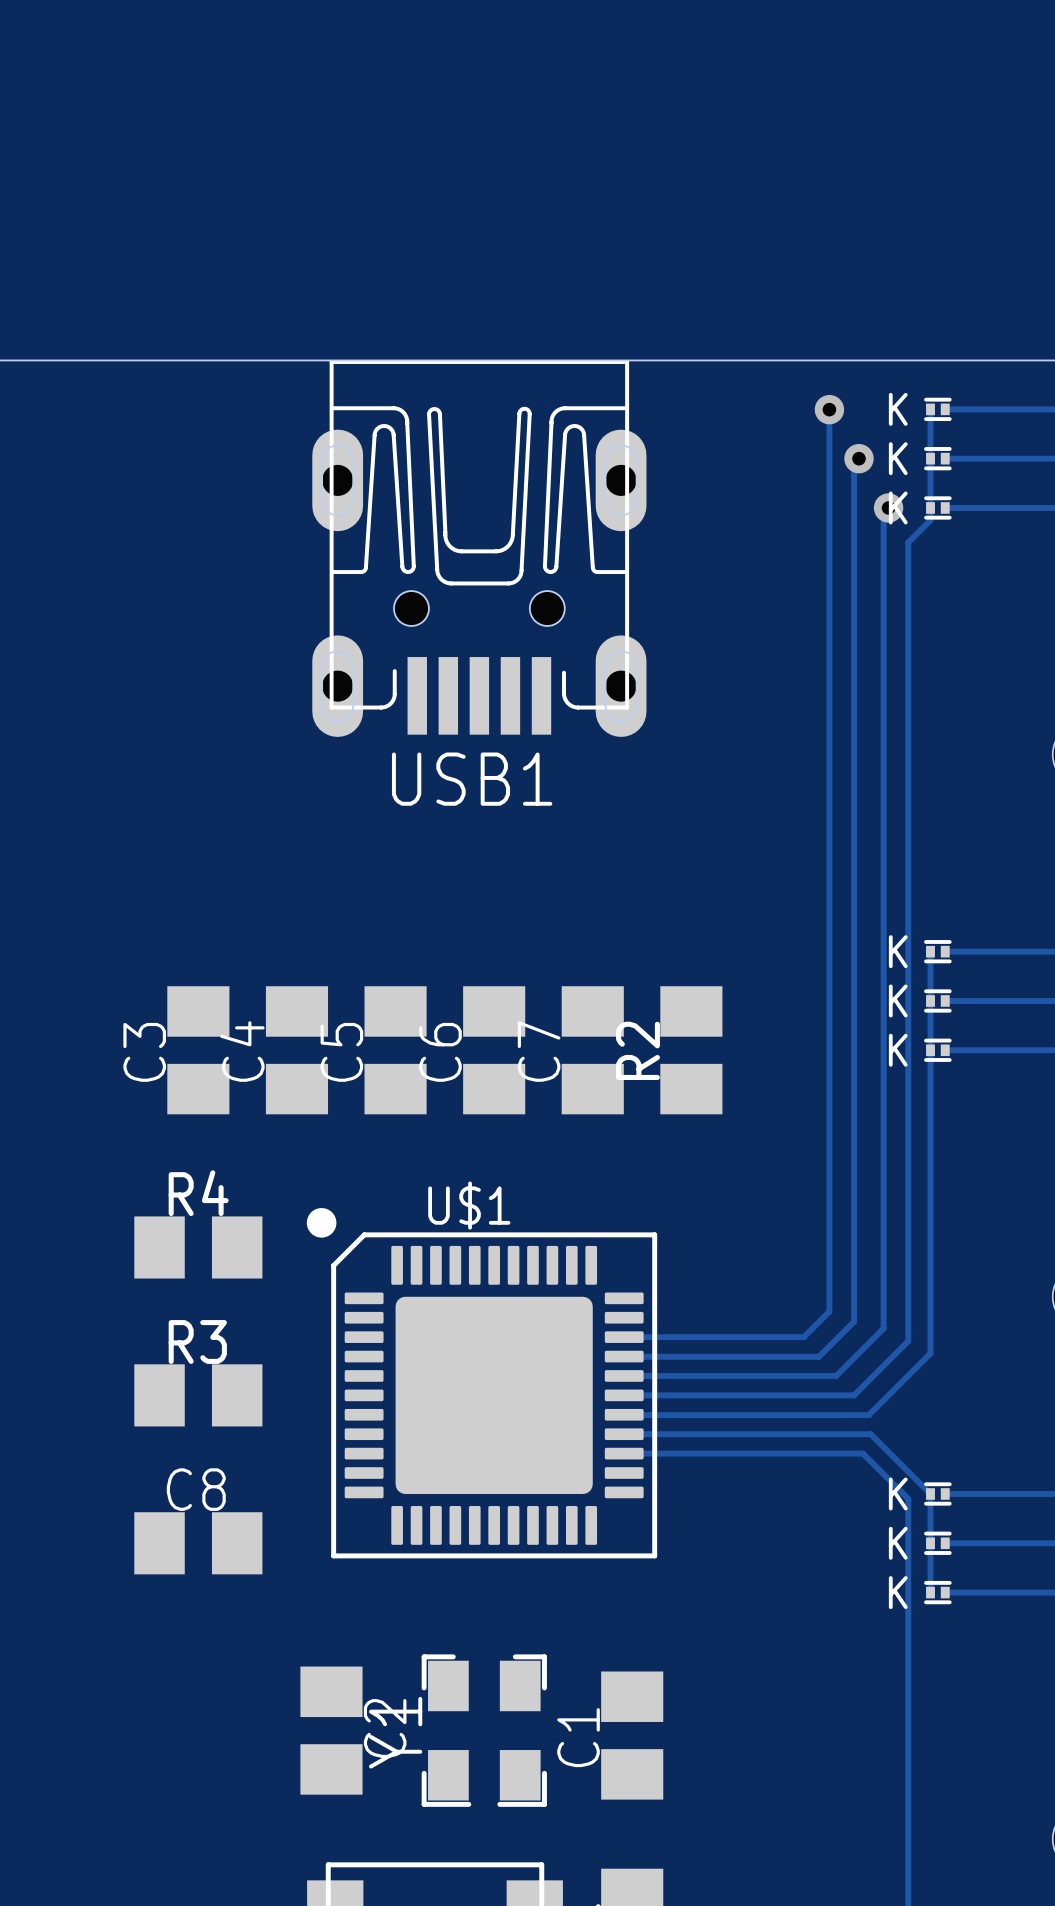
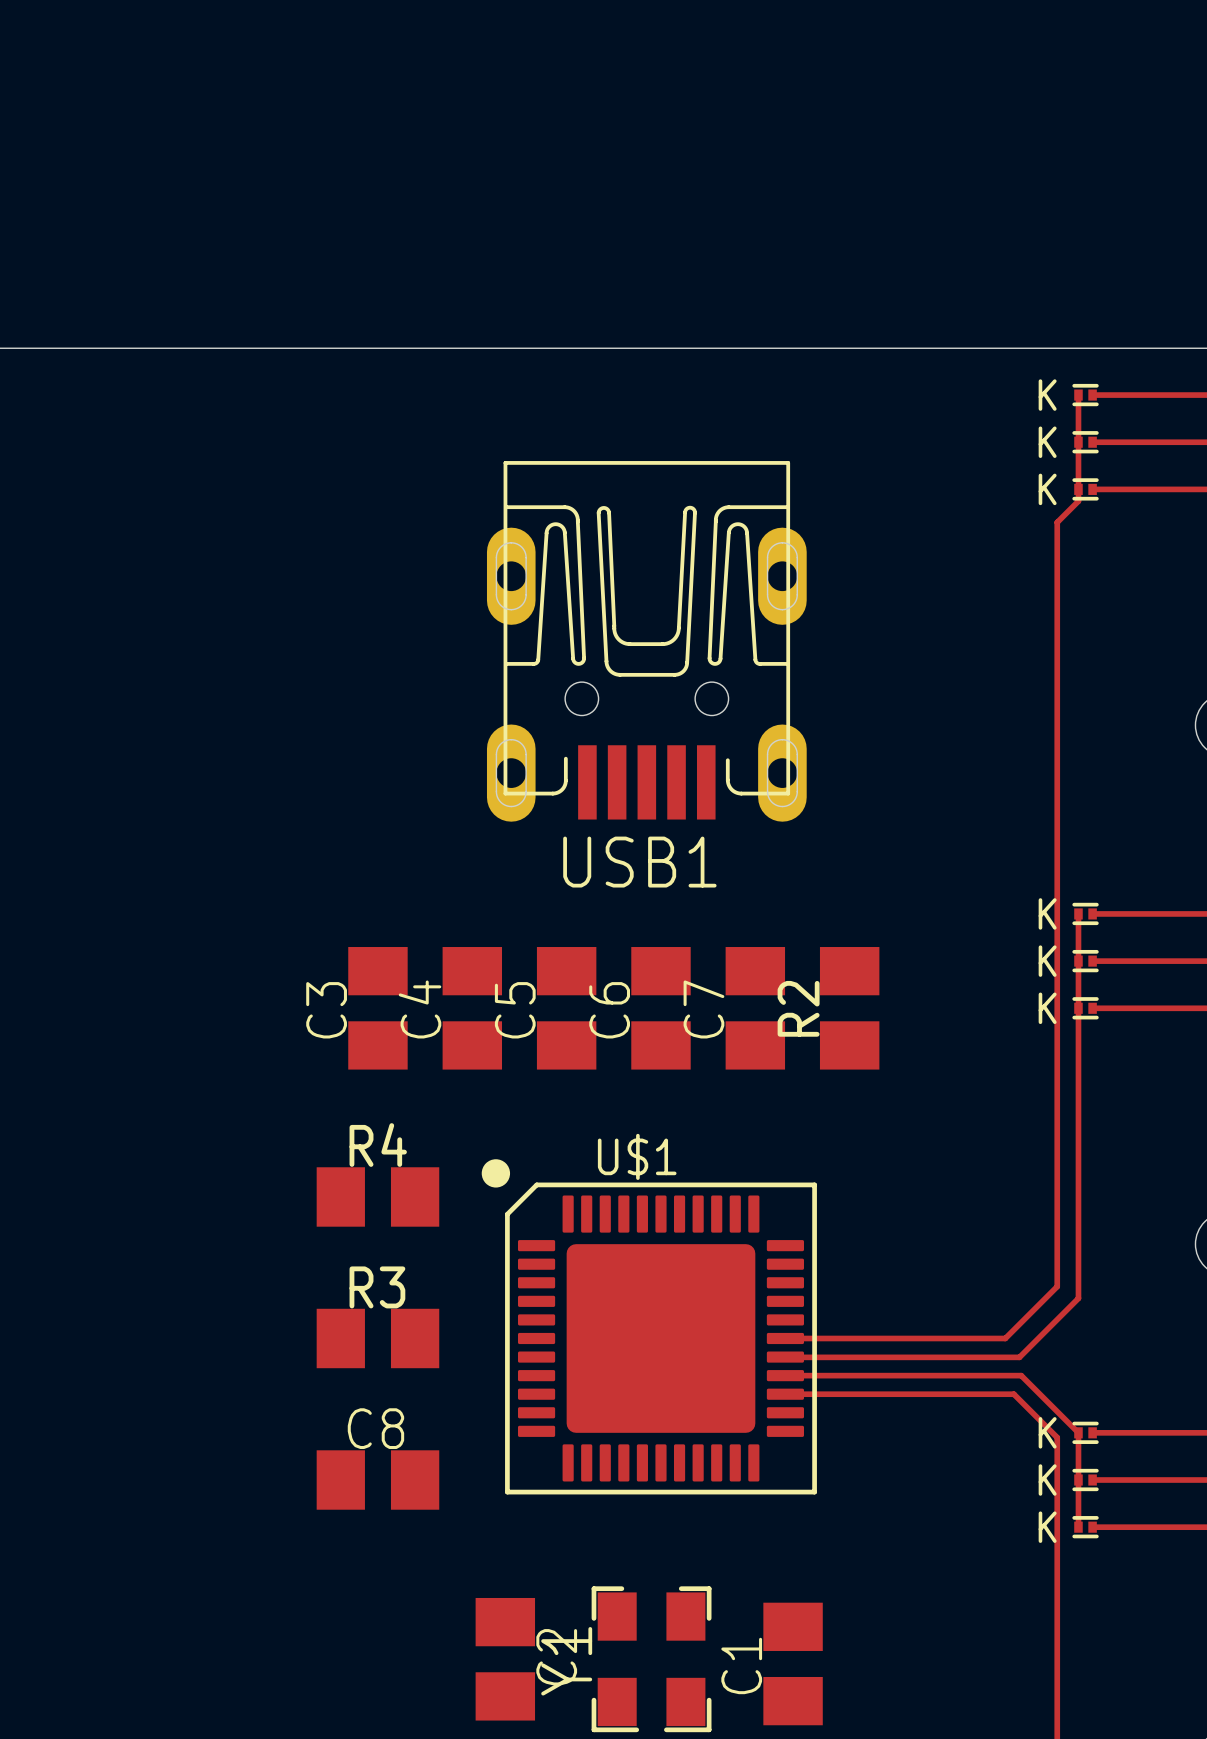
track: (829, 409) (829, 1311) (803, 1337) (624, 1337) -> none
via: (829, 409) -> none
track: (858, 458) (854, 463) (854, 1321) (819, 1356) (624, 1356) -> none
via: (858, 458) -> none
track: (888, 507) (883, 512) (883, 1328) (836, 1375) (624, 1375) -> none
via: (888, 507) -> none
USB1 position: (479, 548) -> (646, 641)

